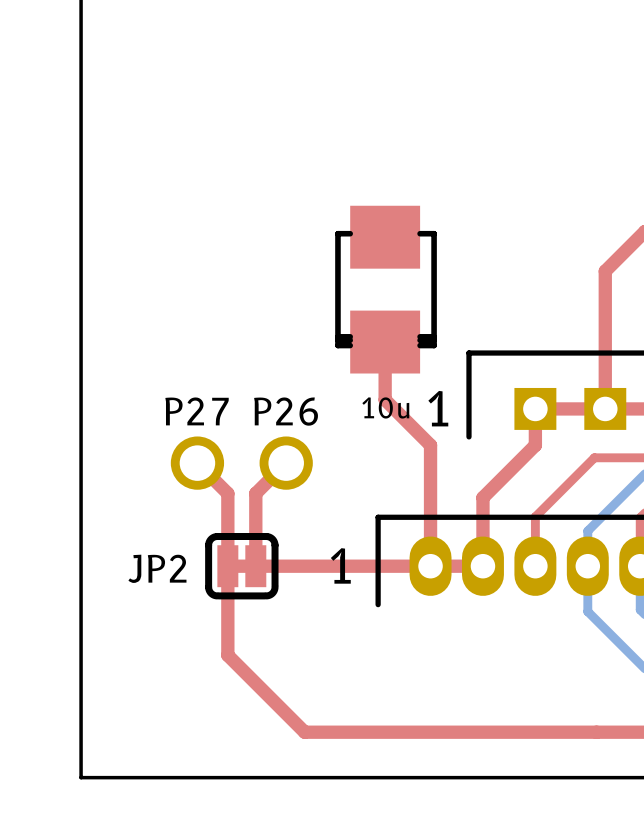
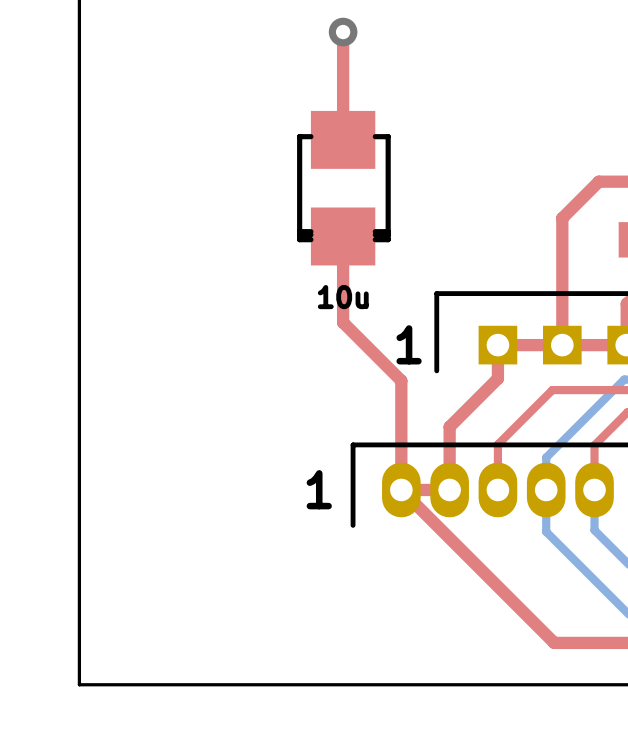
top track: none -> (343, 32) (343, 139)
via: none -> (343, 32)
part position: (386, 289) -> (343, 188)
top track: (385, 342) (385, 399) (430, 445) (430, 447) -> (343, 236) (343, 322) (401, 380)
top track: (197, 463) (227, 493) (227, 655) (304, 732) (596, 732) -> (401, 489) (554, 642)
P27: (197, 463) -> none
top track: (286, 463) (255, 493) (255, 566) -> none
P26: (286, 463) -> none
top track: (227, 566) (430, 566) -> none
JP2: (241, 566) -> none

